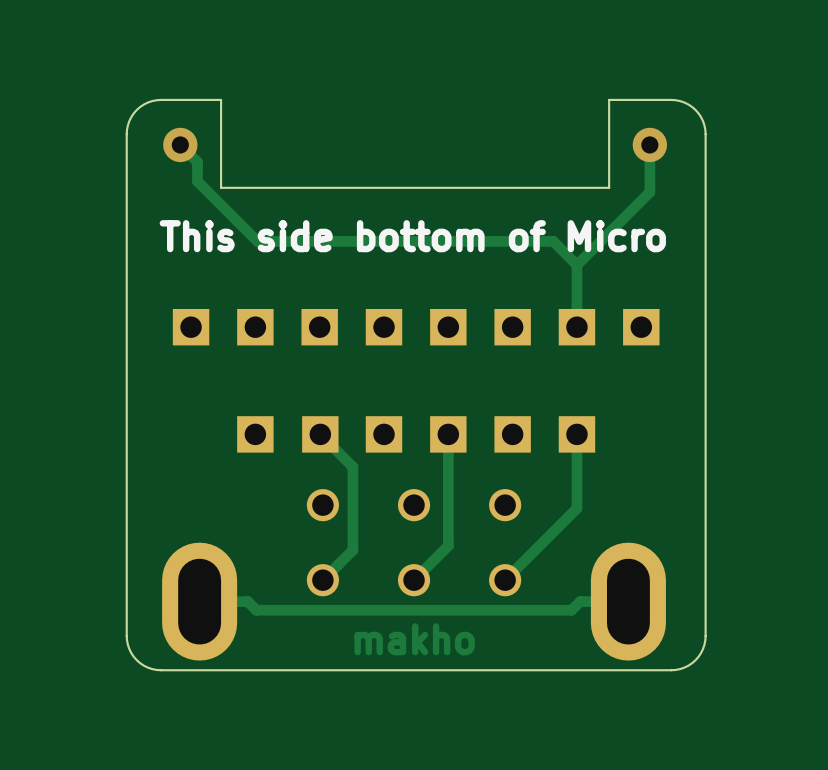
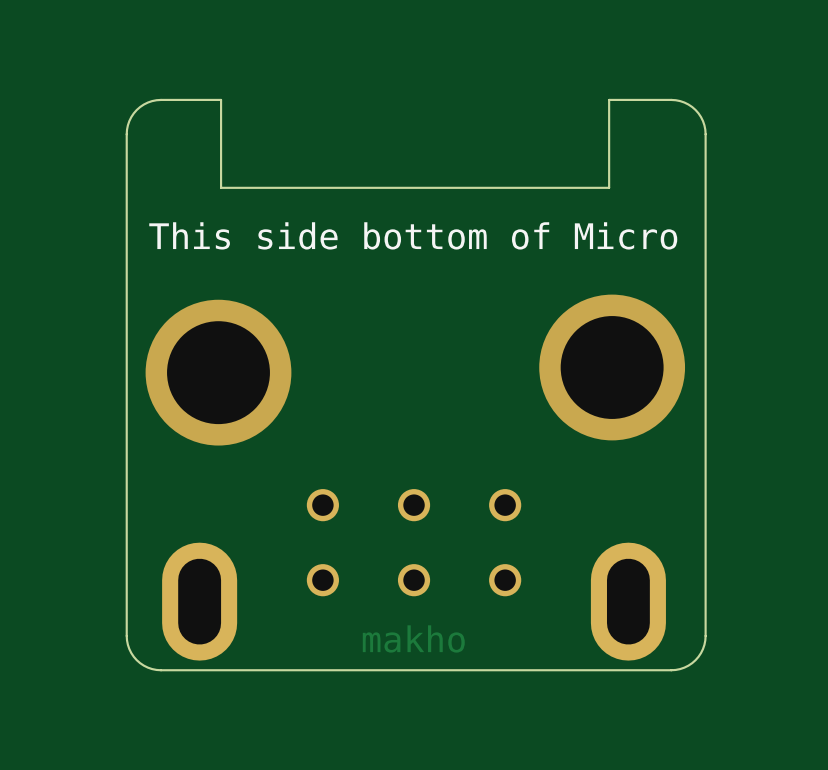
track: (180, 144) (197, 162) (197, 181) (257, 241) (553, 241) (576, 265) -> none
via: (180, 144) -> none
track: (649, 144) (649, 192) (576, 265) -> none
via: (649, 144) -> none
track: (576, 265) (576, 327) -> none
part: (191, 327) -> none
part: (255, 327) -> none
part: (319, 327) -> none
part: (384, 327) -> none
part: (448, 327) -> none
part: (512, 327) -> none
part: (576, 327) -> none
part: (641, 327) -> none
via: none -> (612, 367)
via: none -> (218, 372)
part: (255, 434) -> none
track: (320, 434) (352, 466) (352, 550) (322, 580) -> none
part: (320, 434) -> none
part: (384, 434) -> none
track: (448, 434) (448, 545) (414, 580) -> none
part: (448, 434) -> none
part: (512, 434) -> none
track: (576, 434) (576, 508) (505, 580) -> none
part: (576, 434) -> none
track: (628, 601) (580, 601) (571, 610) (256, 610) (247, 601) (199, 601) -> none

